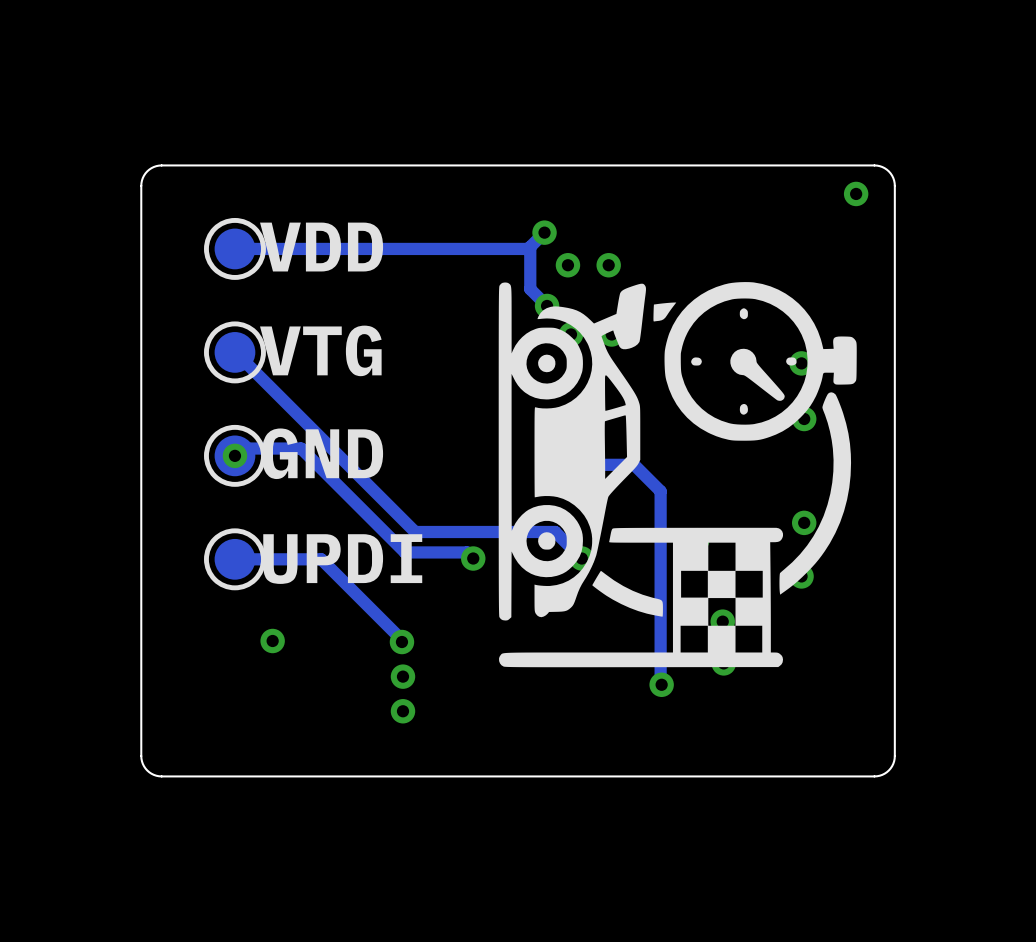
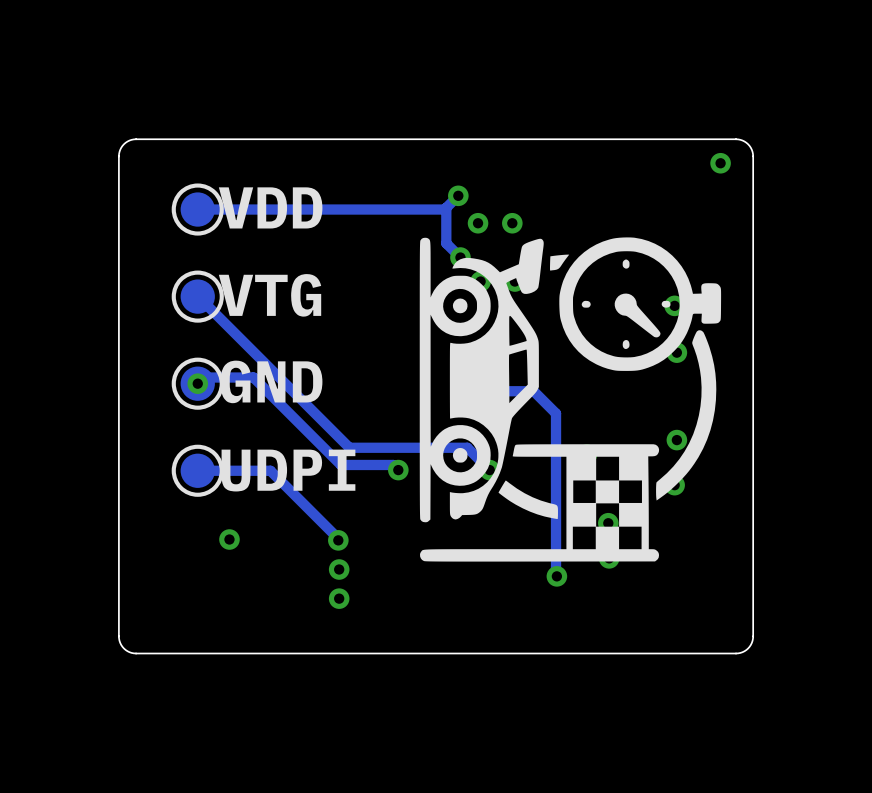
text: UPDI (342, 559) -> UDPI (288, 470)

